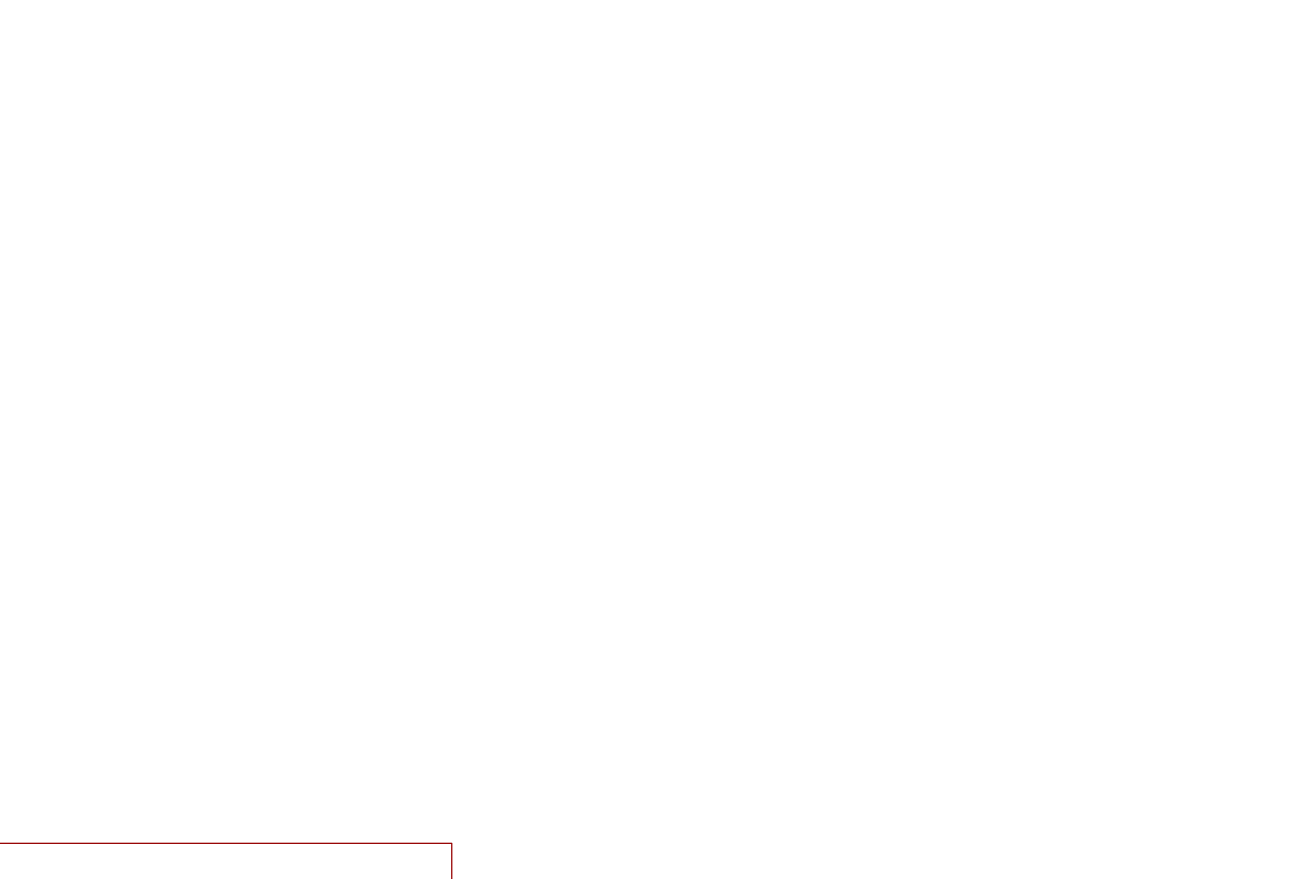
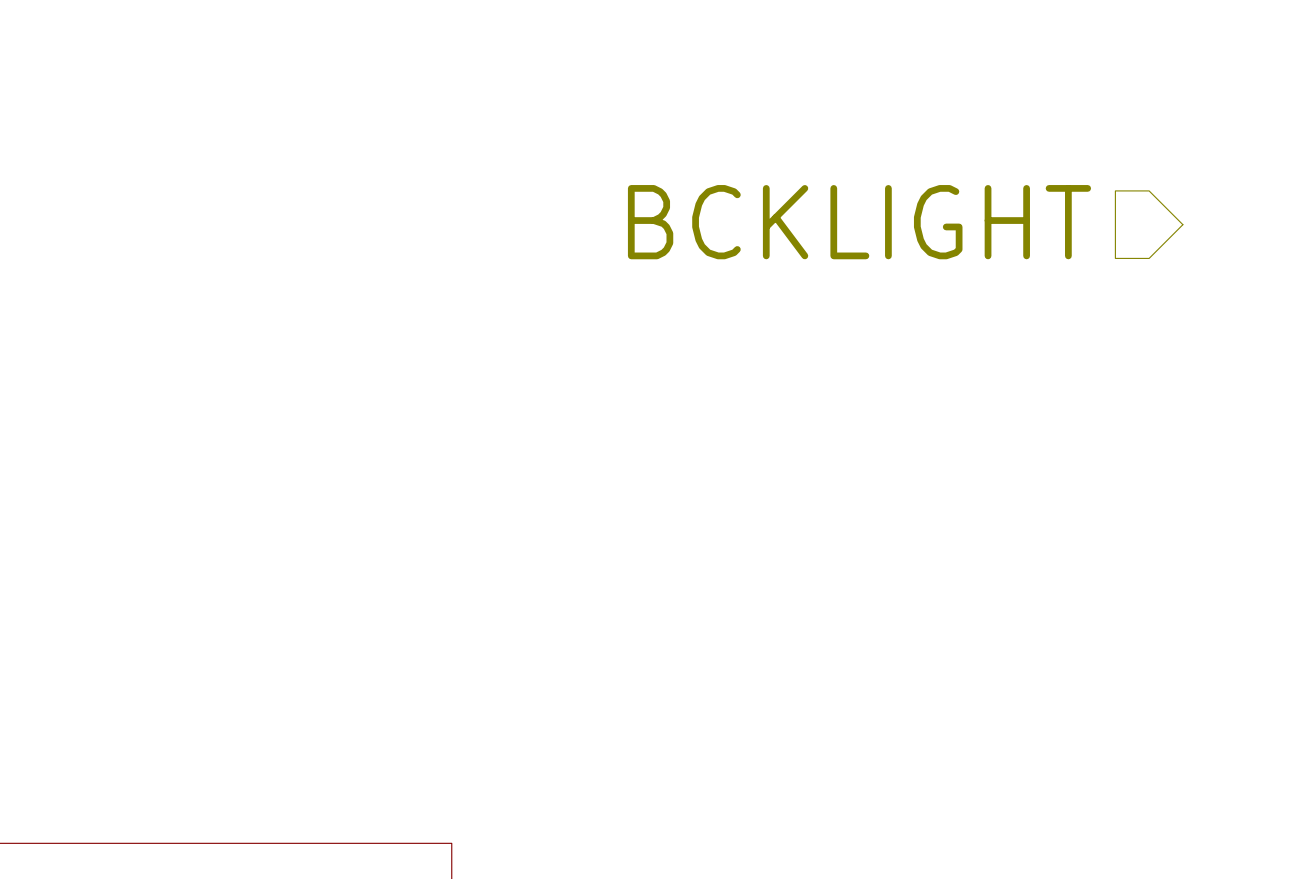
hierarchical label: none -> BCKLIGHT (859, 222)

